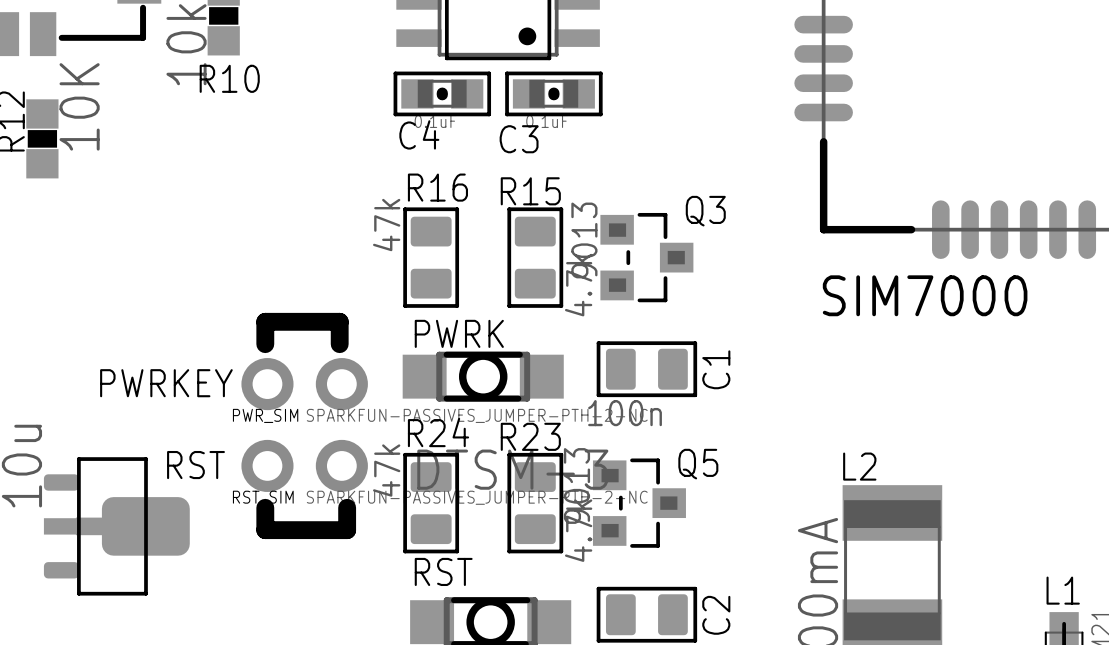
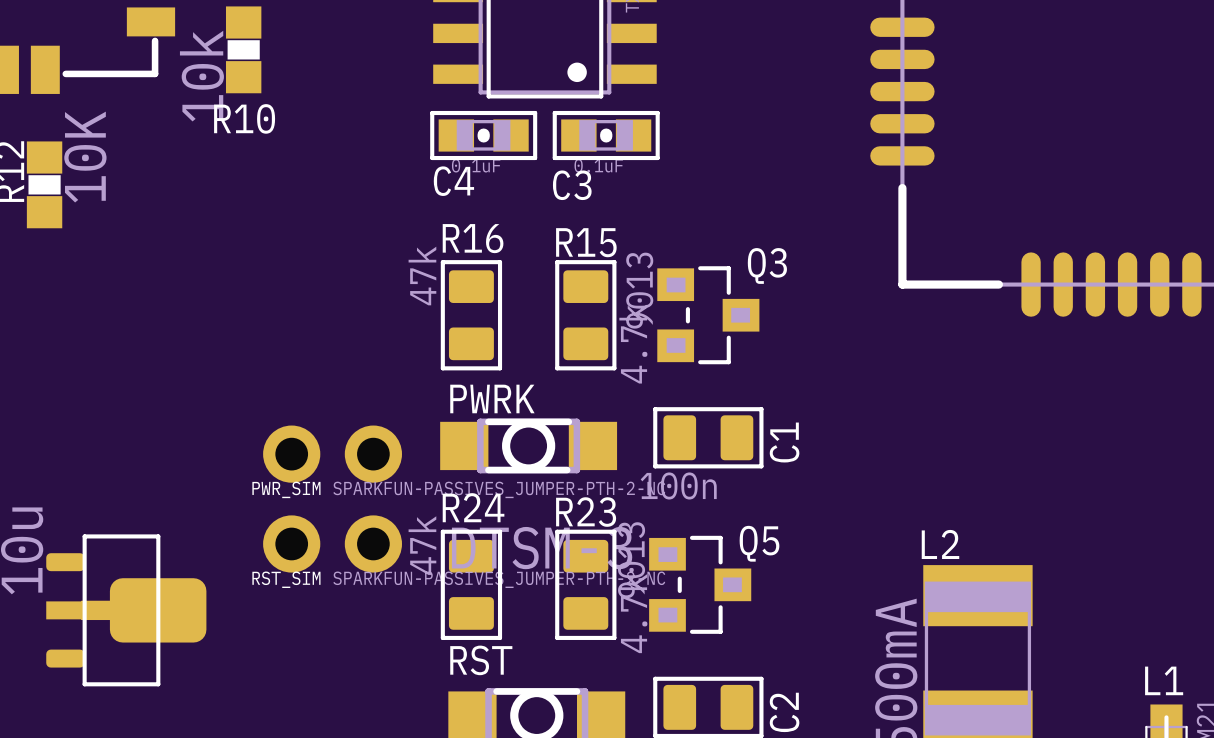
text: SIM7000 (925, 295) -> none
line: (265, 344) (265, 321) (339, 321) (339, 344) -> none
text: PWRKEY (166, 383) -> none
text: RST (195, 465) -> none
line: (265, 507) (265, 530) (347, 530) (347, 507) -> none

